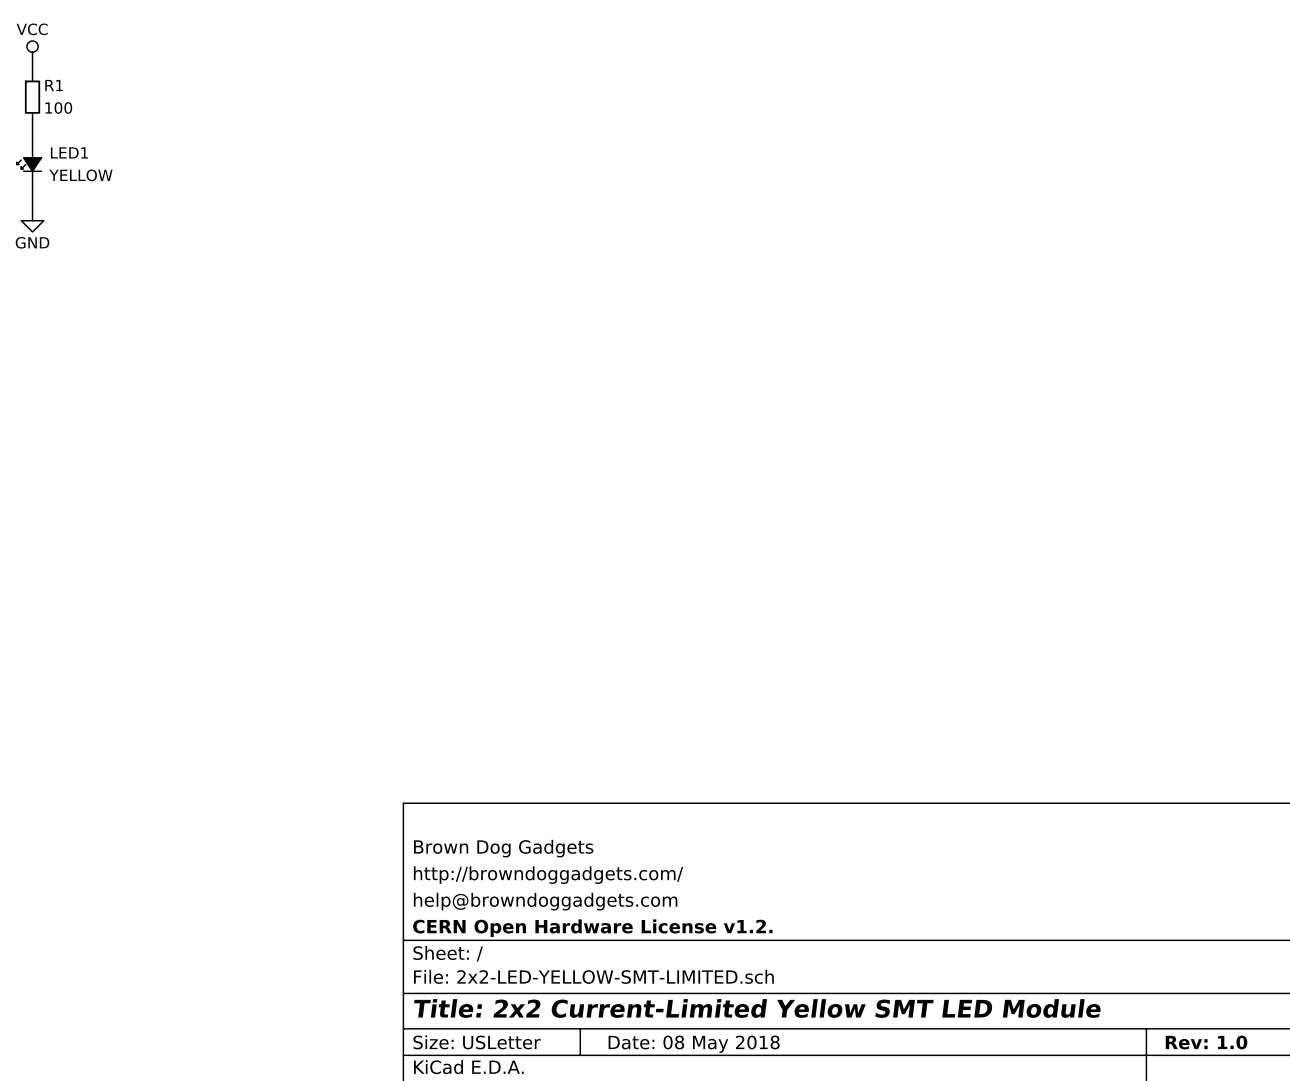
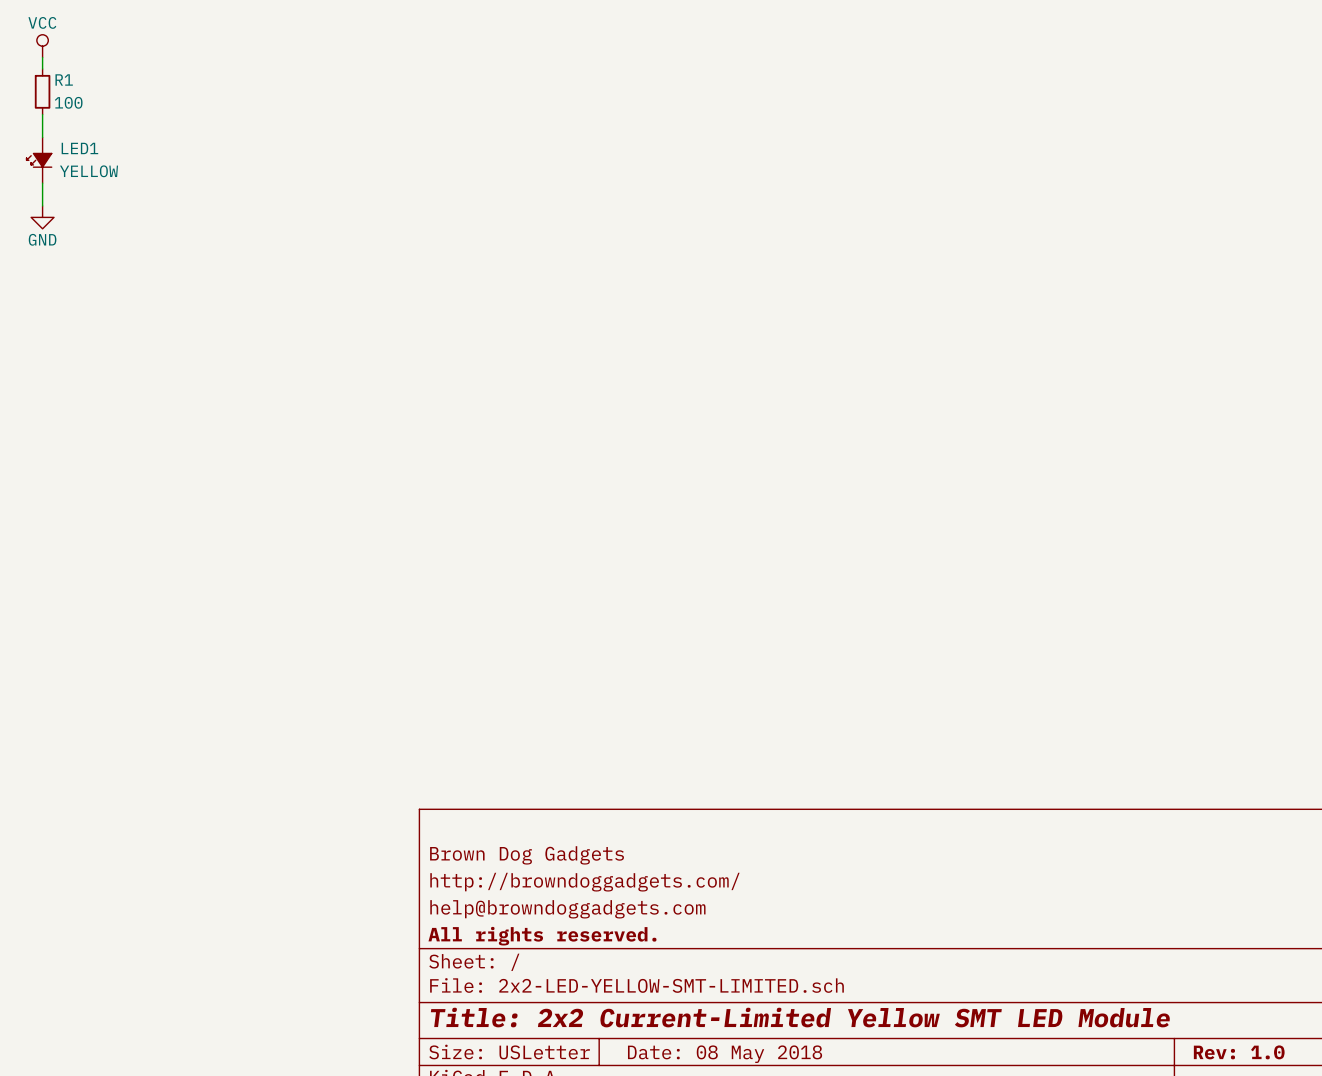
title block: CERN Open Hardware License v1.2. (592, 928) -> All rights reserved. (542, 936)

